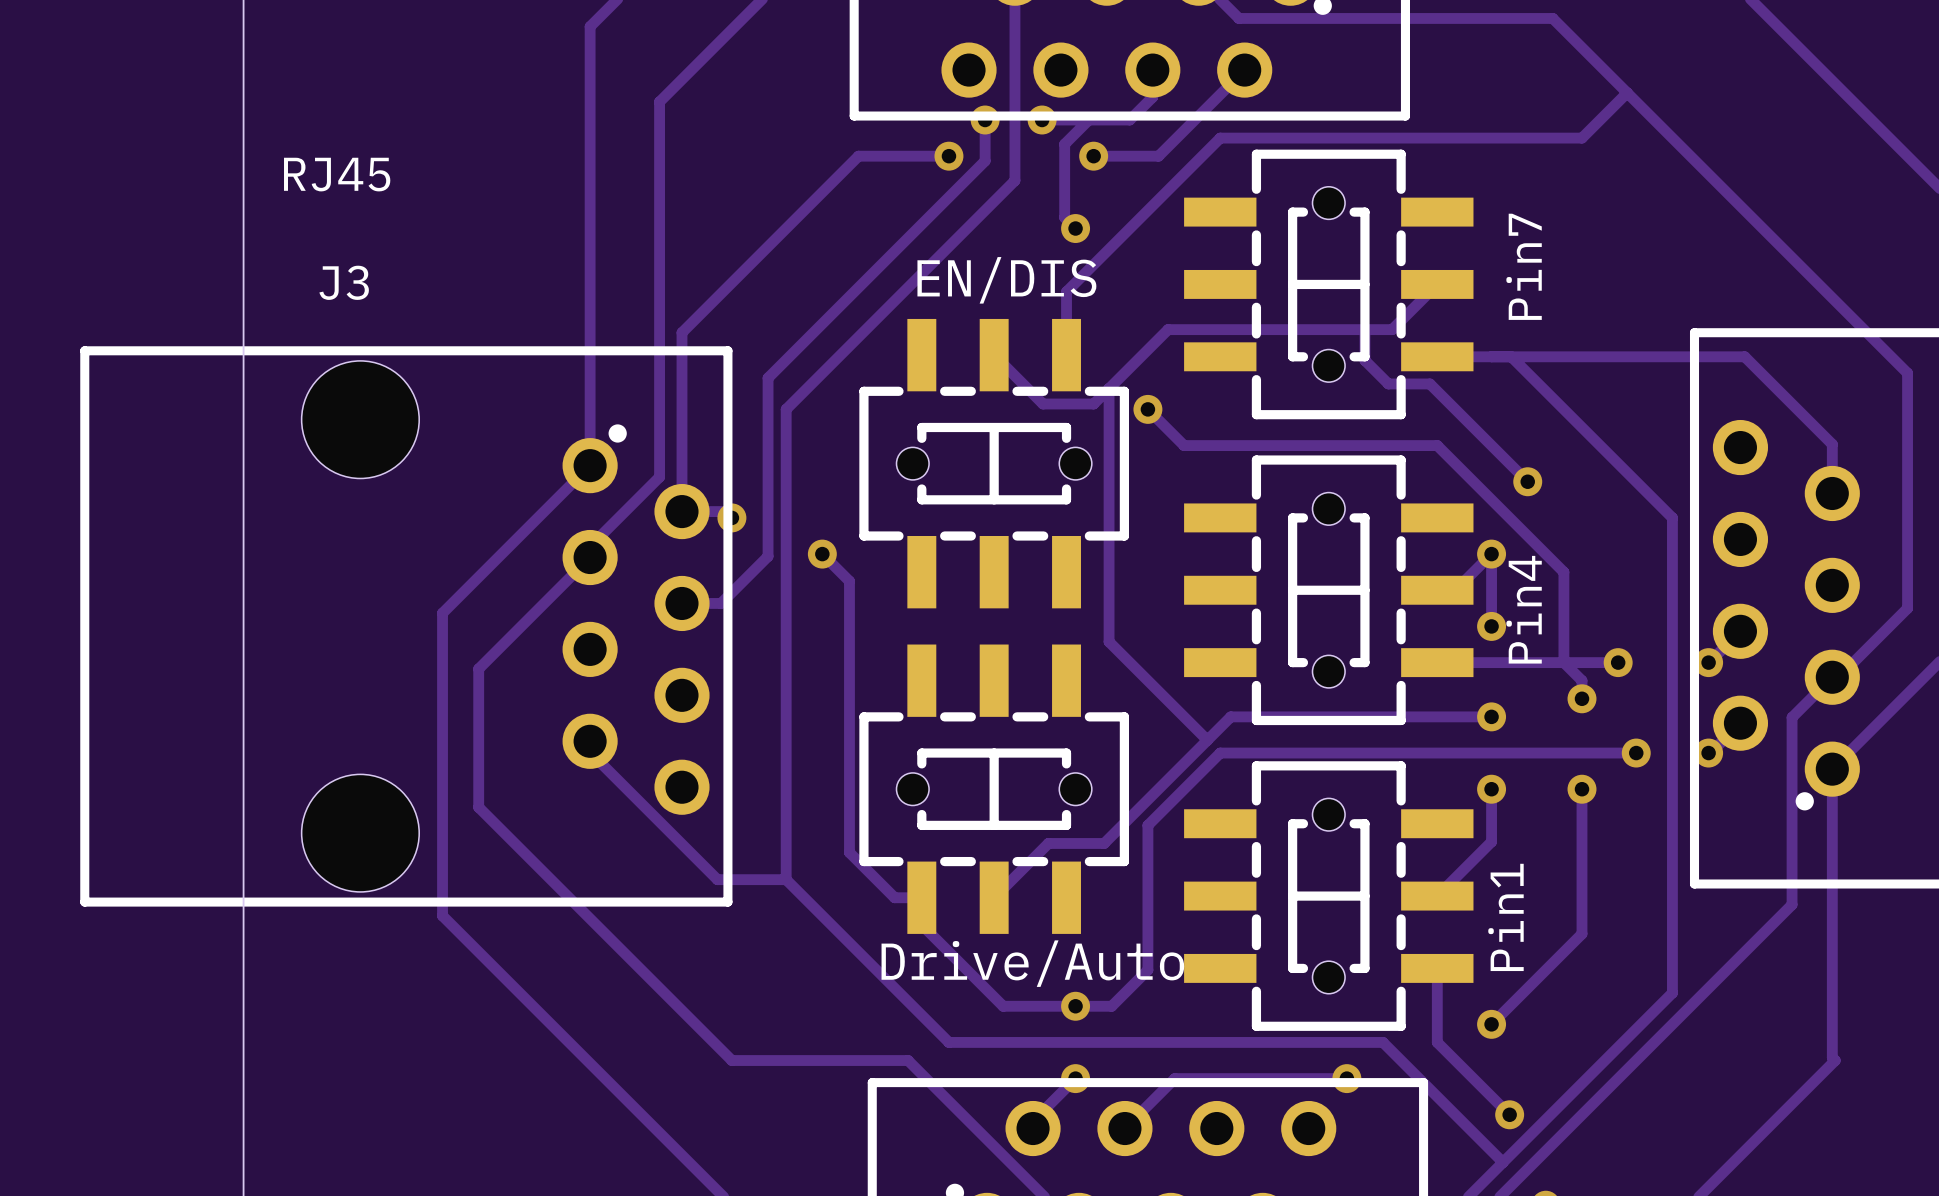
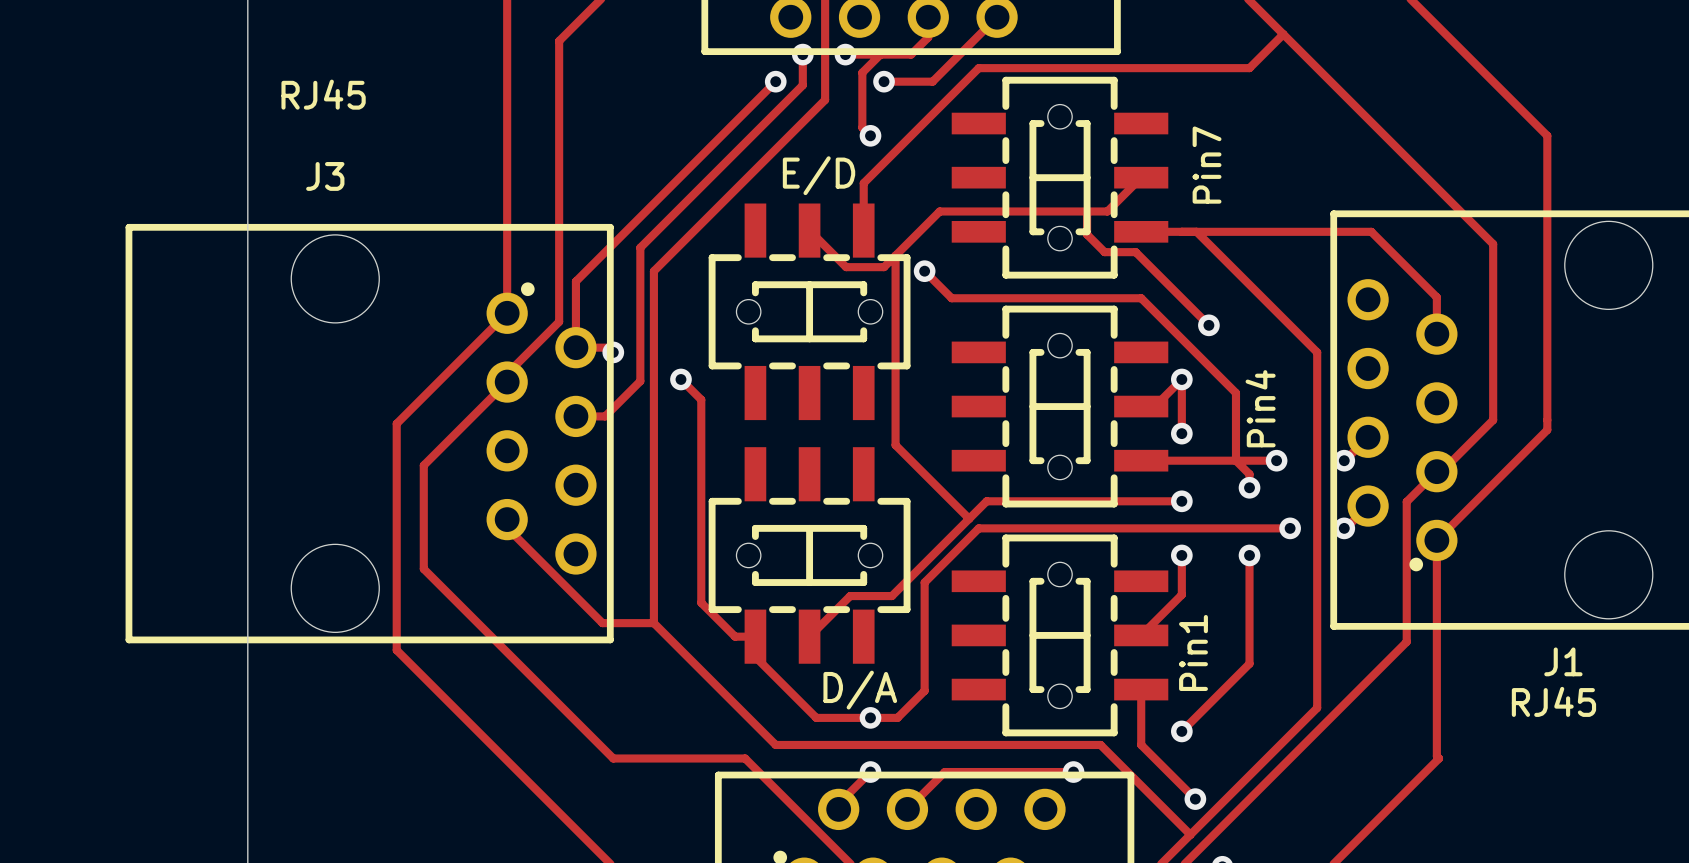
track: (948, 156) (858, 156) (681, 332) (681, 423) -> (775, 81) (575, 281)
text: EN/DIS (1006, 280) -> E/D (819, 175)
part value position: Pin4 (1524, 609) -> Pin4 (1260, 408)
text: Drive/Auto (1032, 963) -> none
text: none -> D/A (860, 690)

